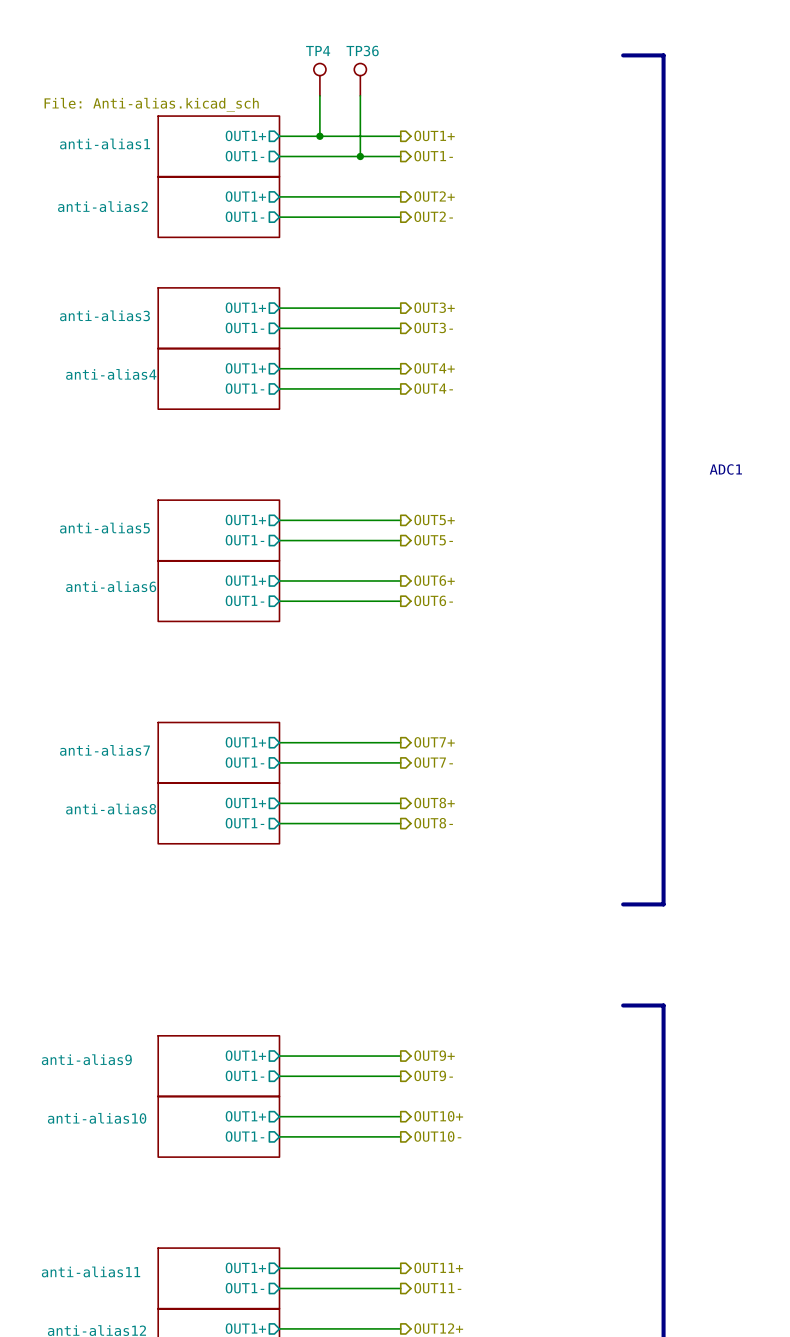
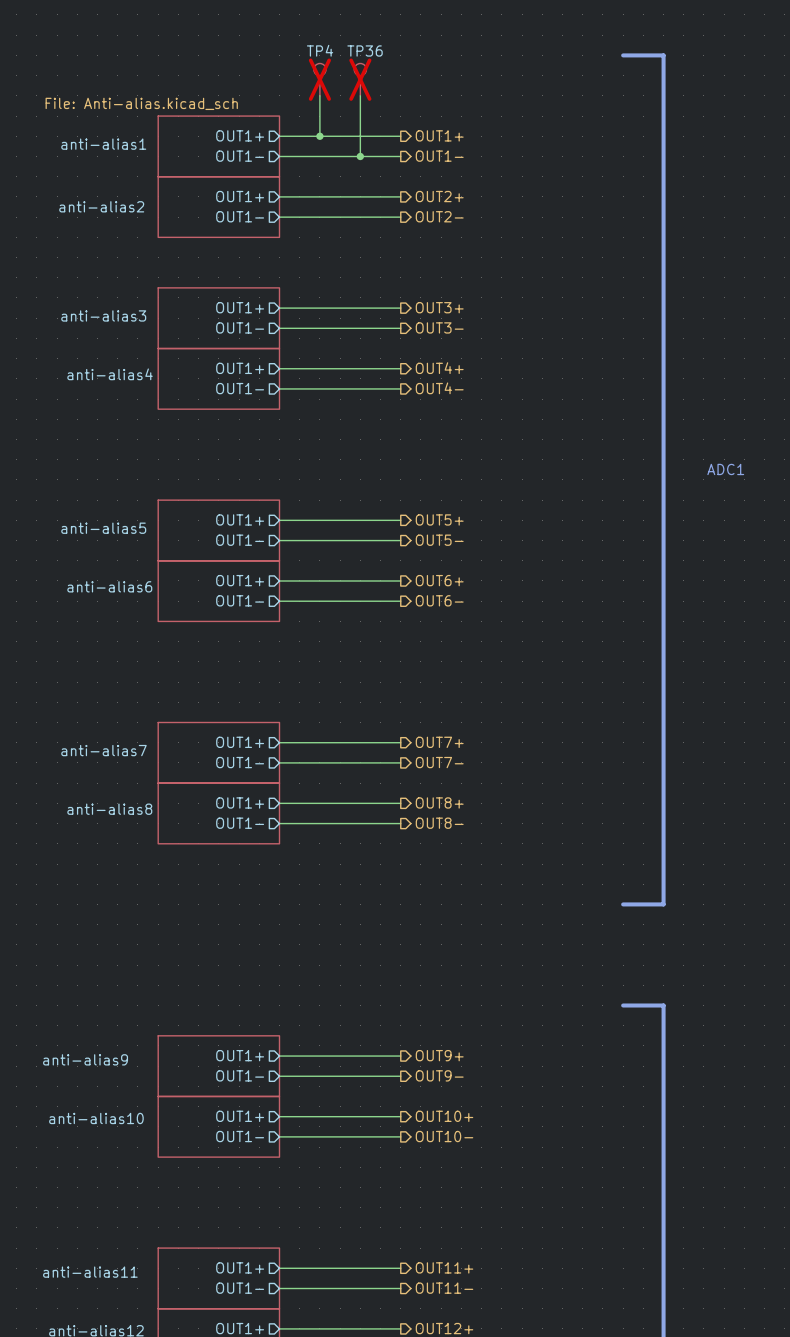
TP4 do-not-place cross: none -> (319, 79)
TP36 do-not-place cross: none -> (360, 79)

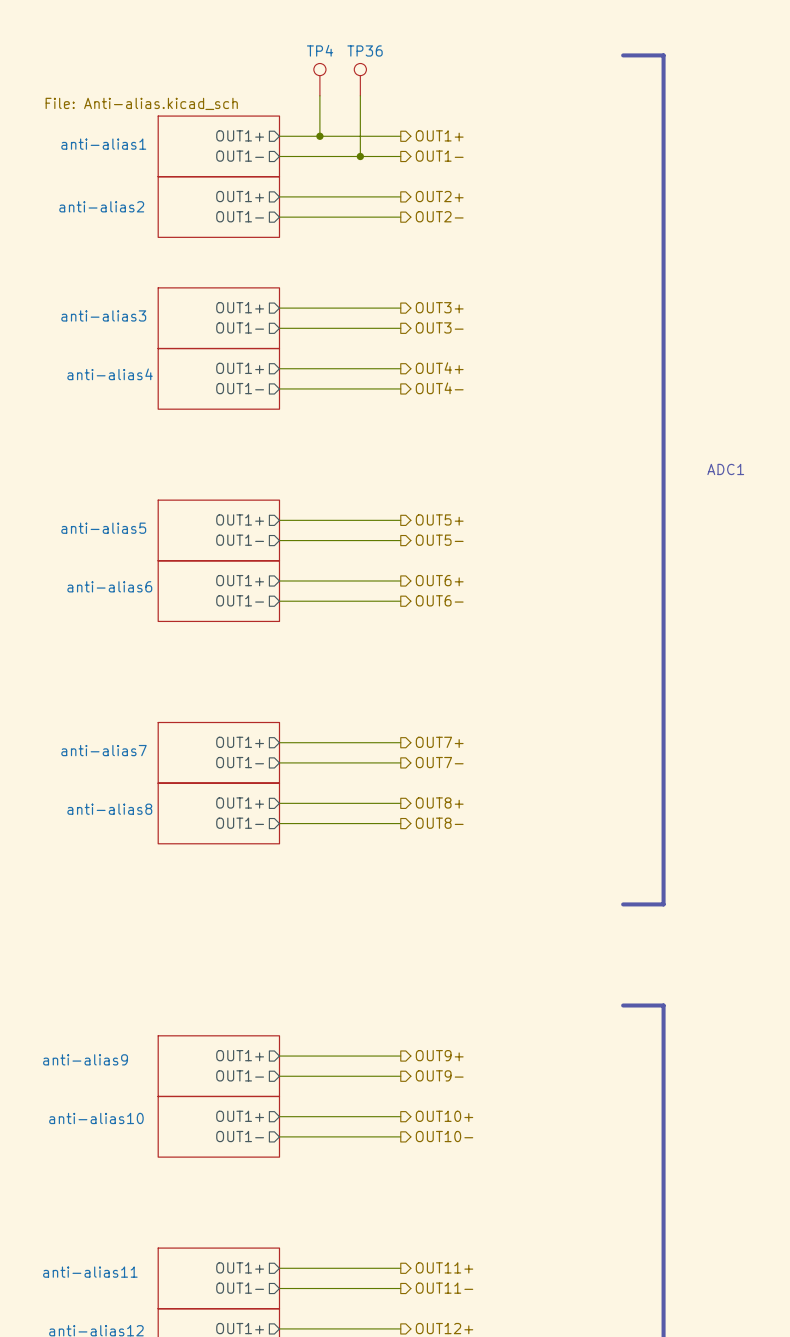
TP4 do-not-place cross: (319, 79) -> none
TP36 do-not-place cross: (360, 79) -> none

